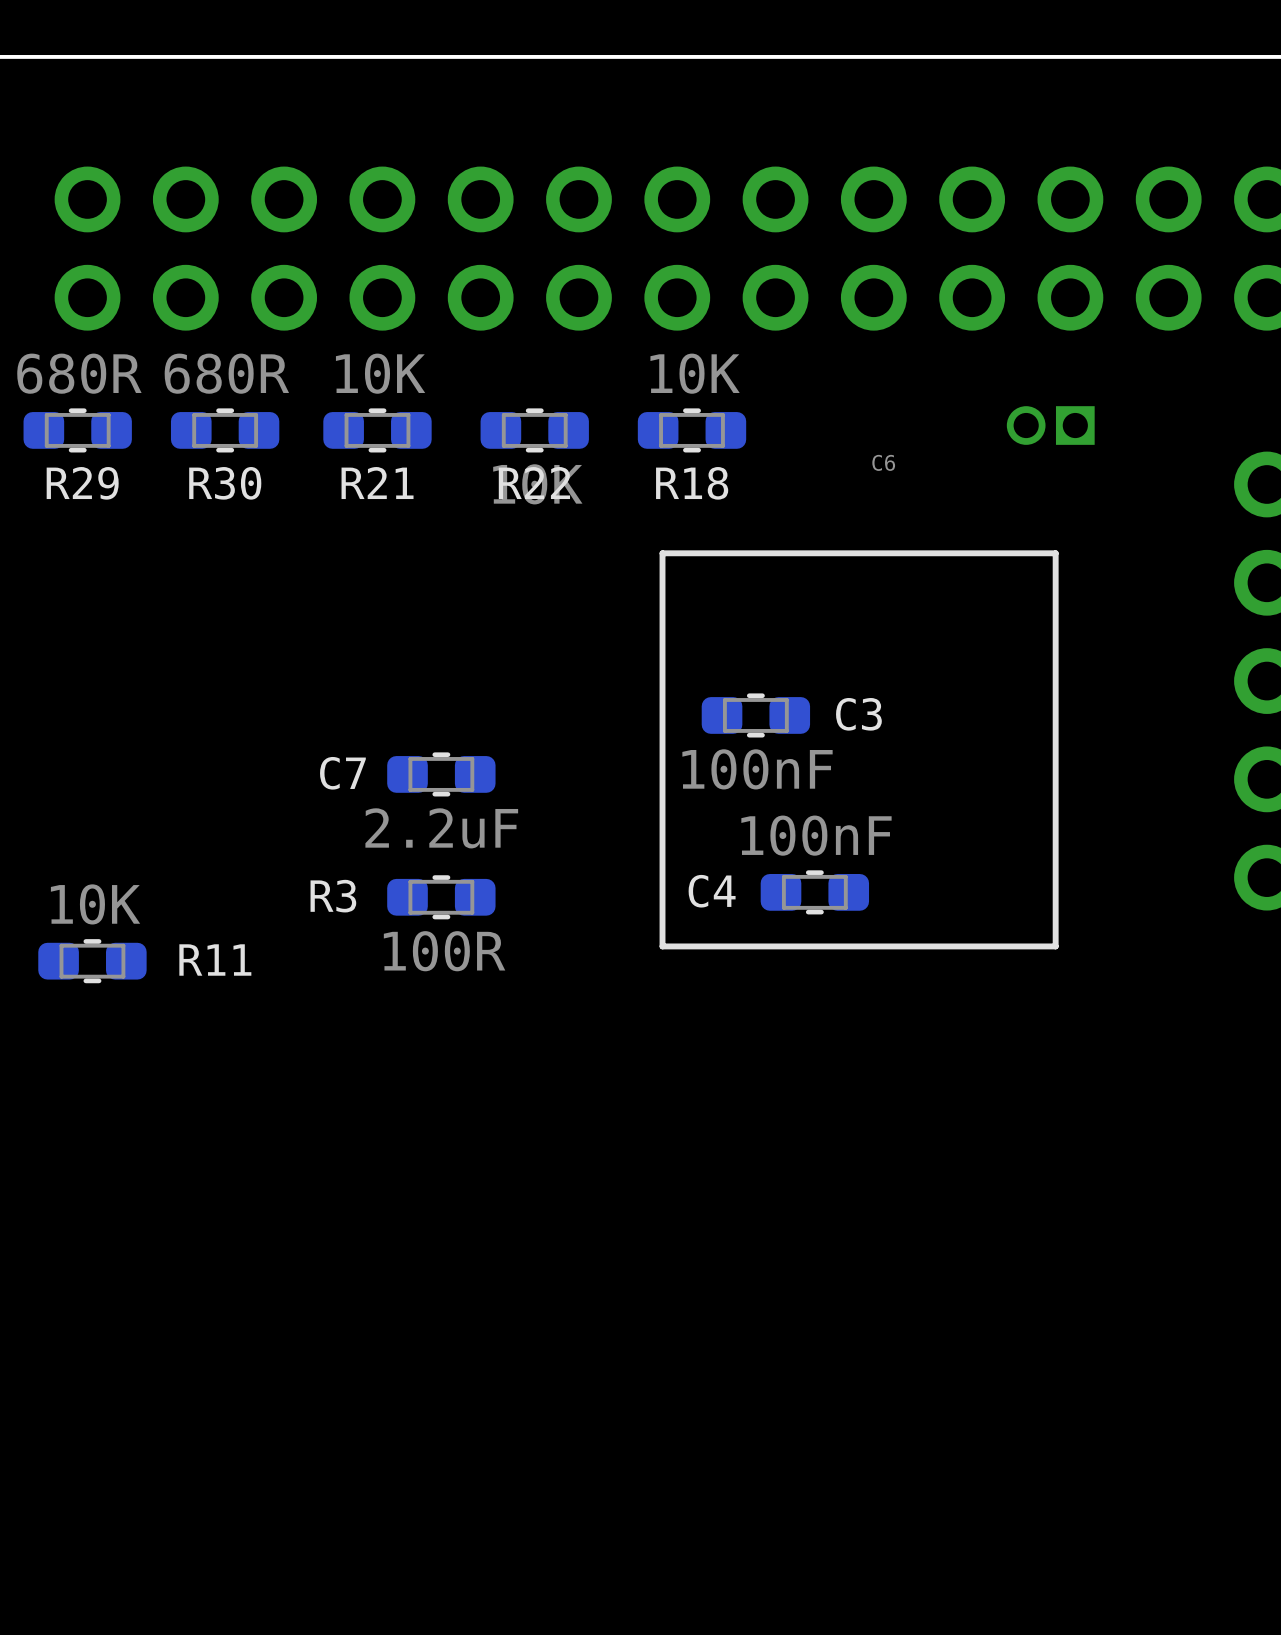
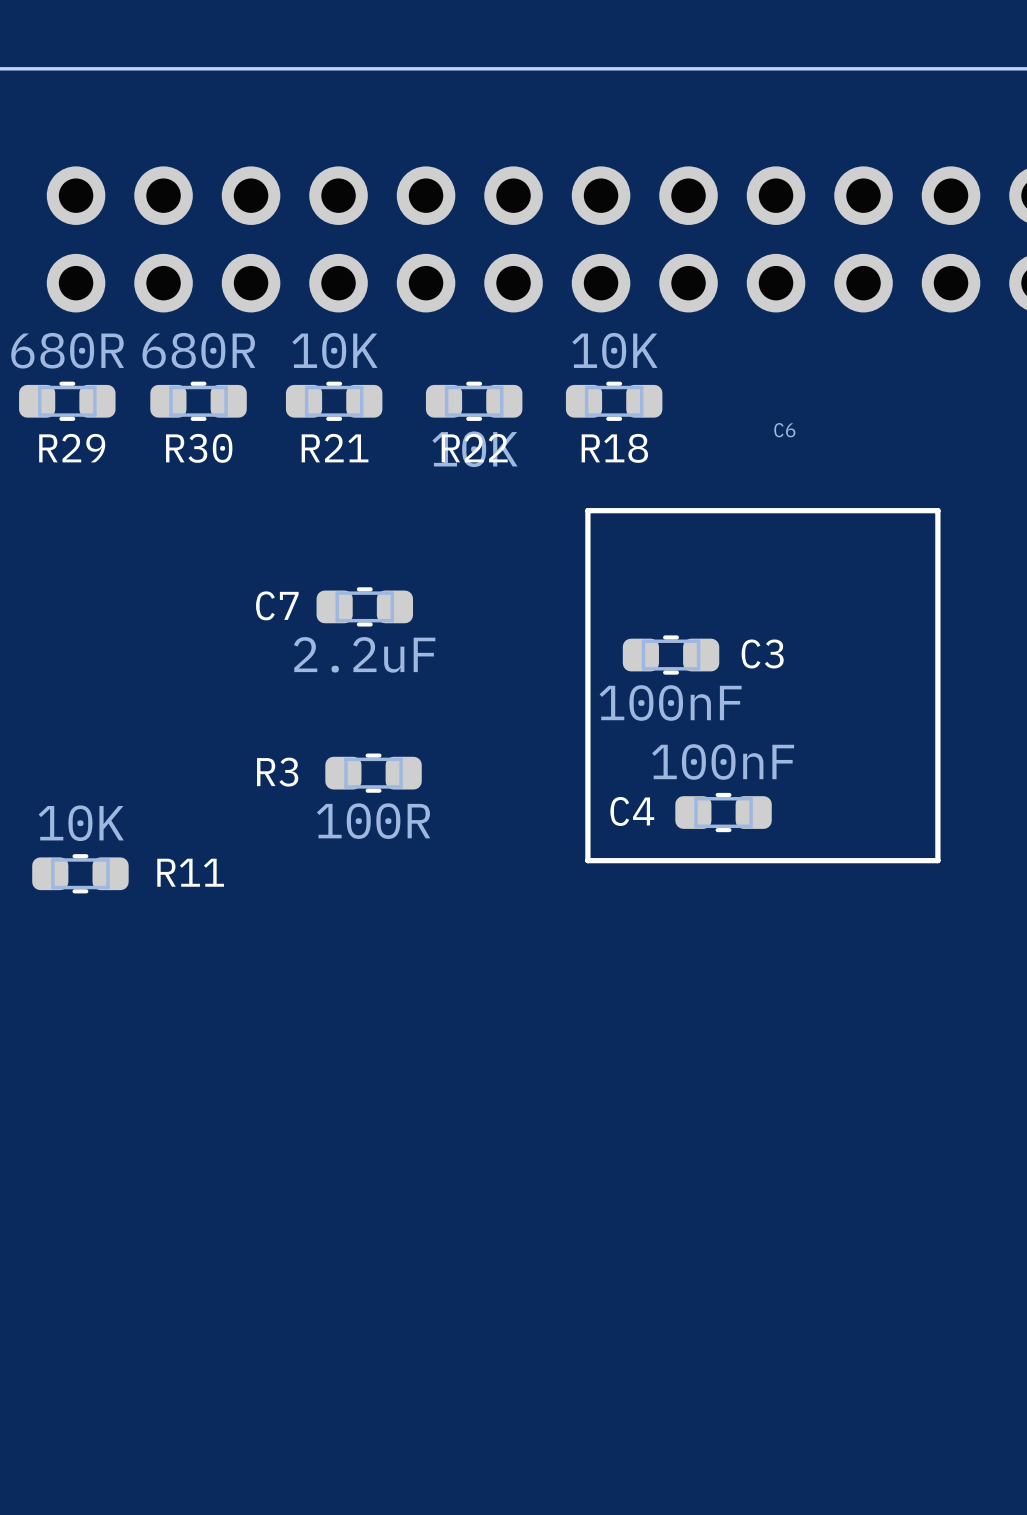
part: (1050, 425) -> none
C7 position: (441, 774) -> (364, 606)
R3 position: (441, 897) -> (373, 773)

